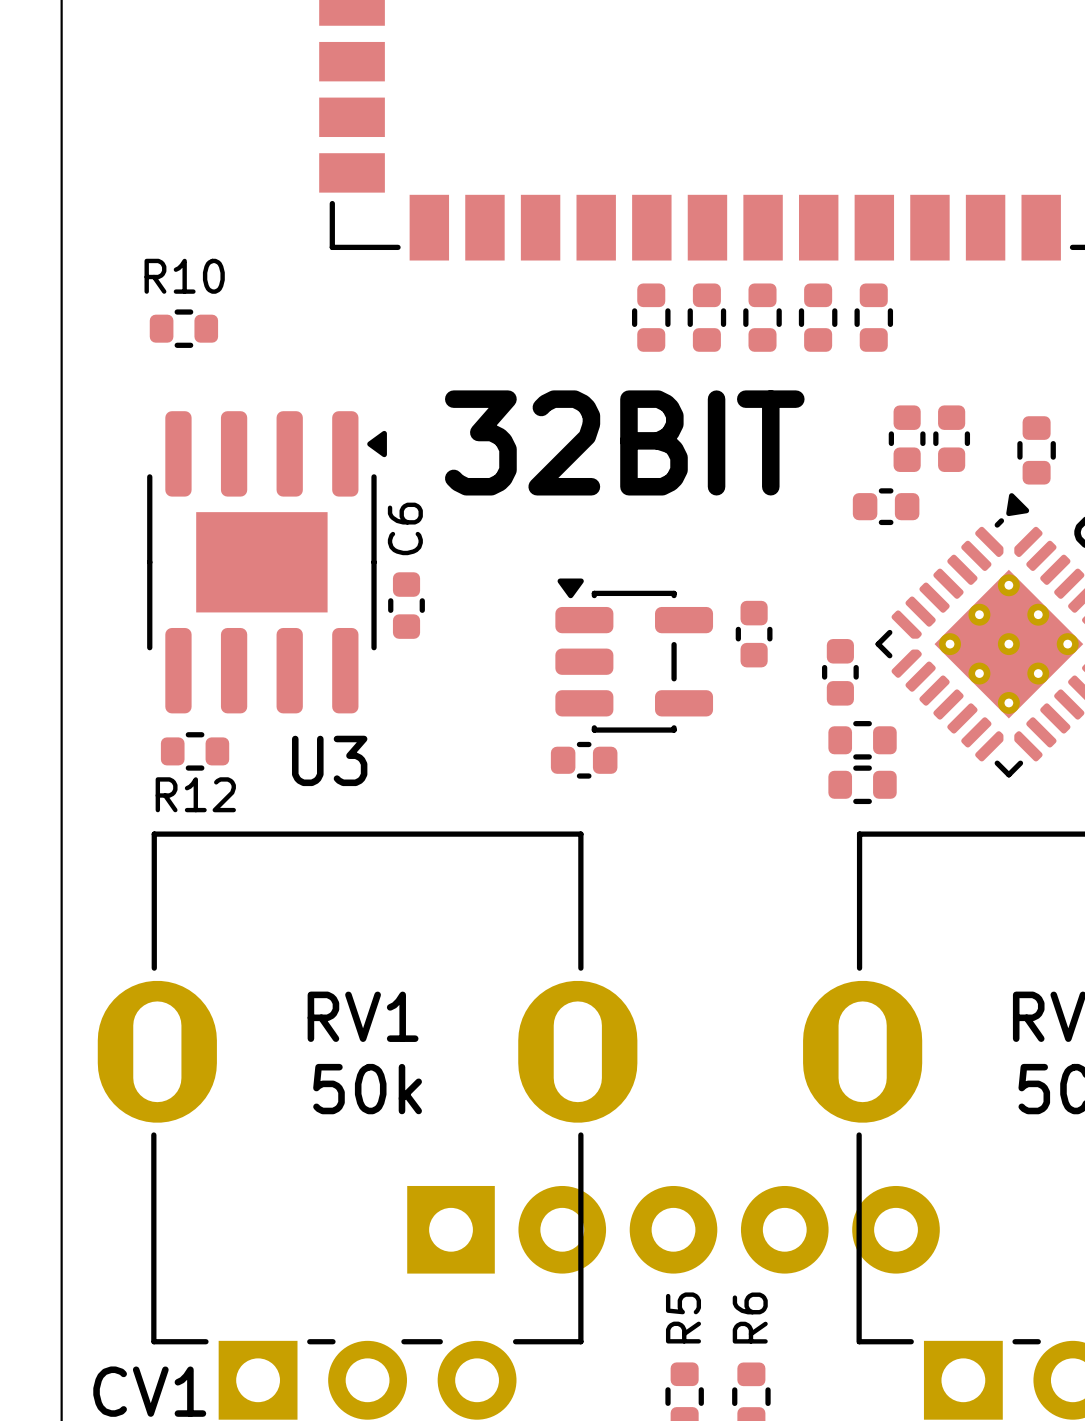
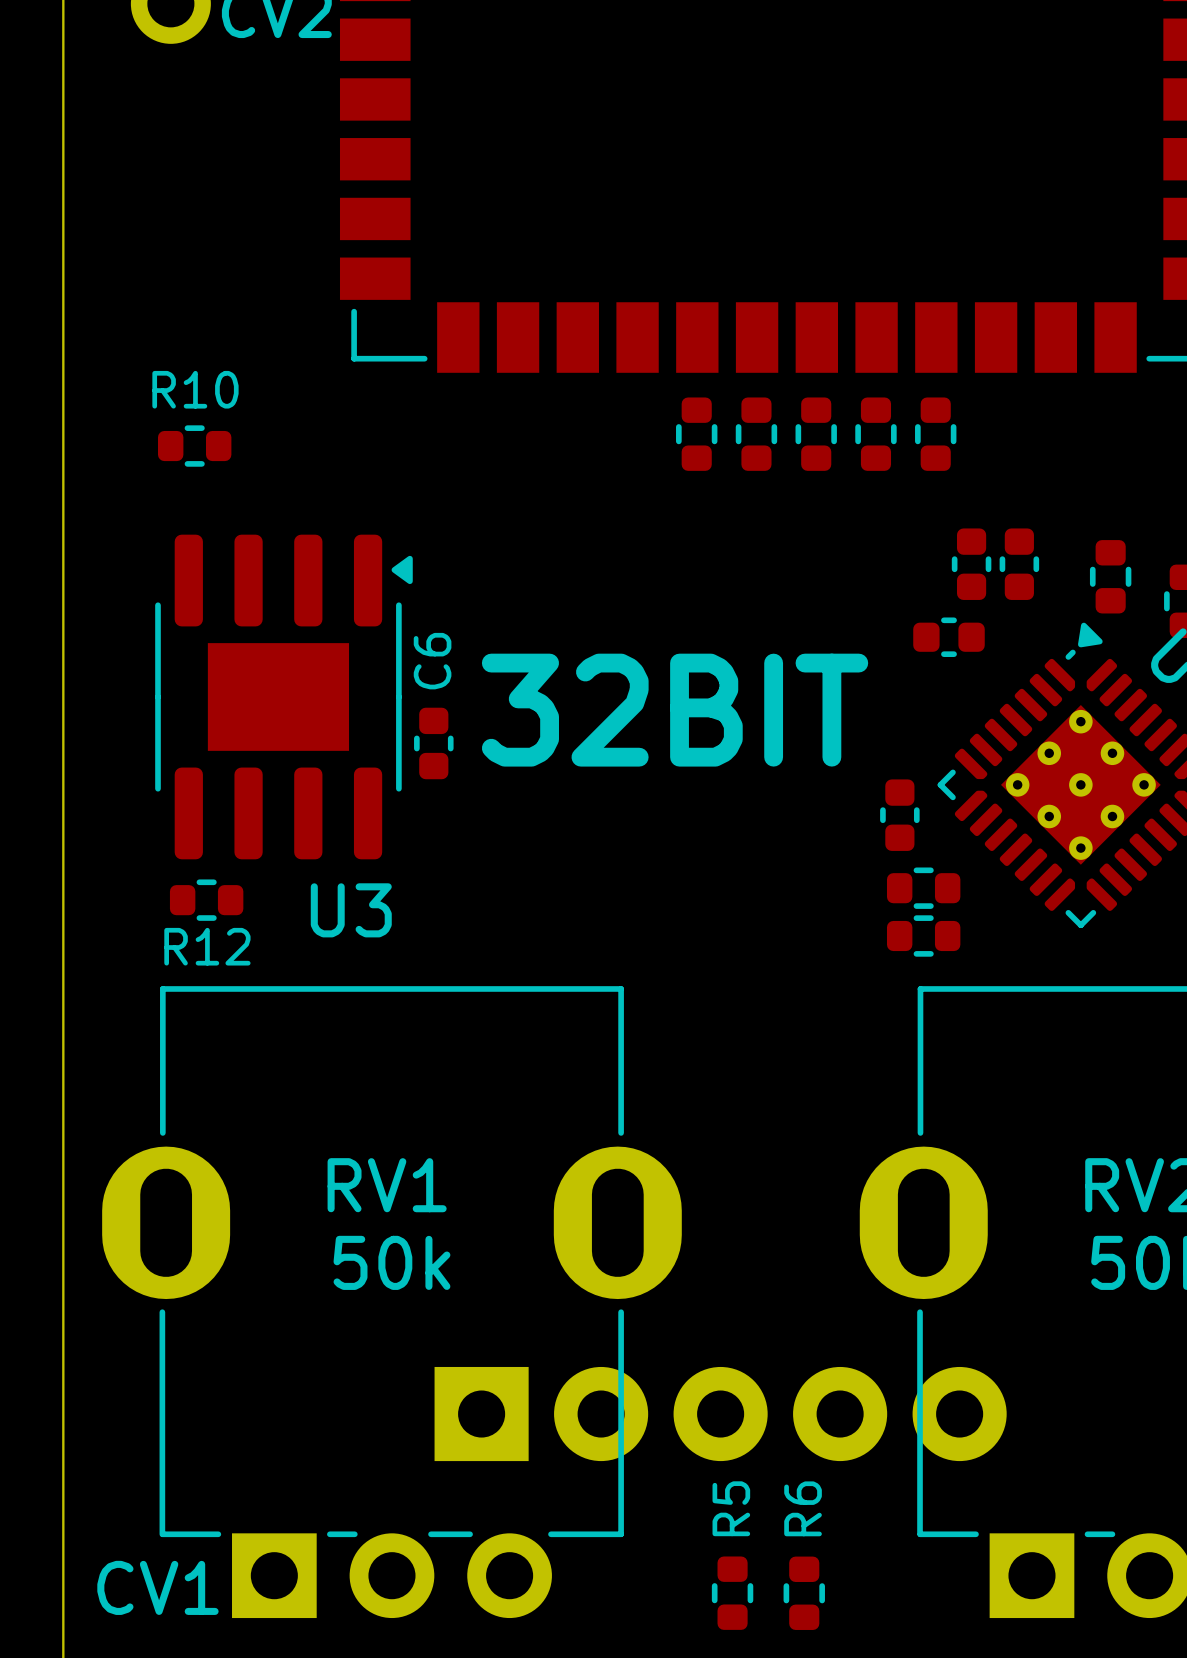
text position: 32BIT (624, 442) -> 32BIT (675, 710)
part: (754, 634) -> none
part: (634, 655) -> none
part: (584, 760) -> none

